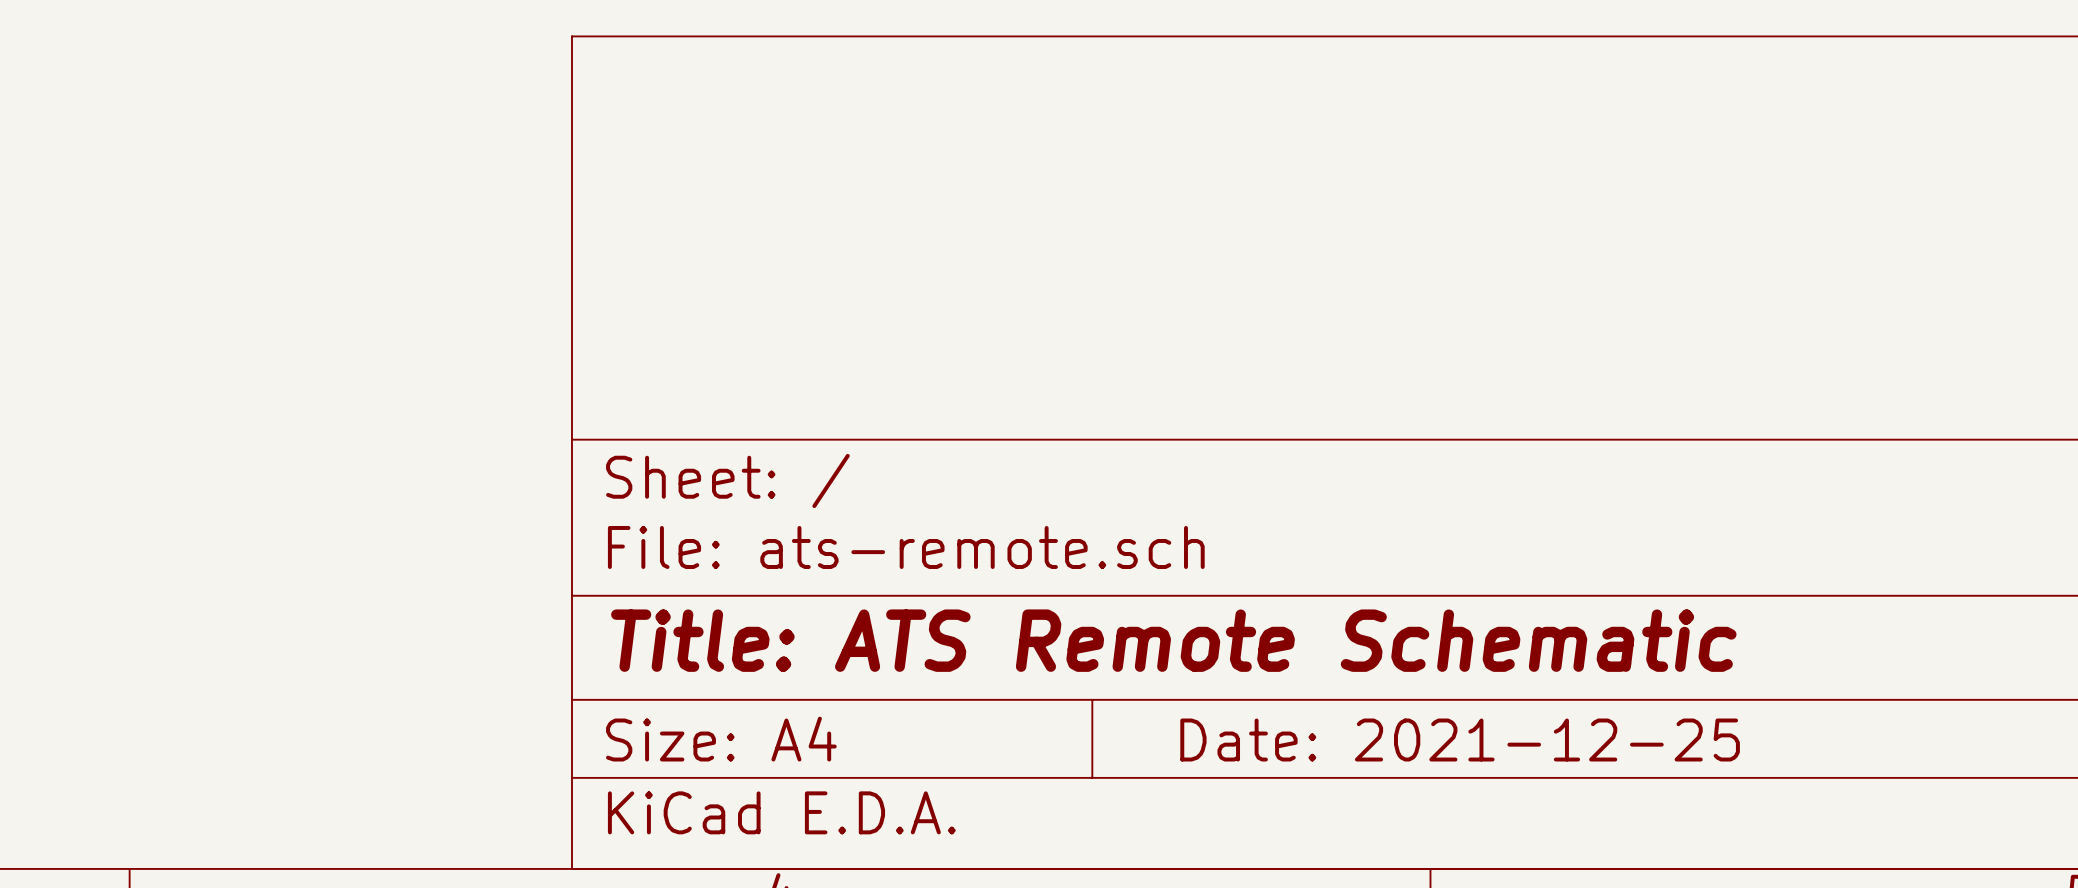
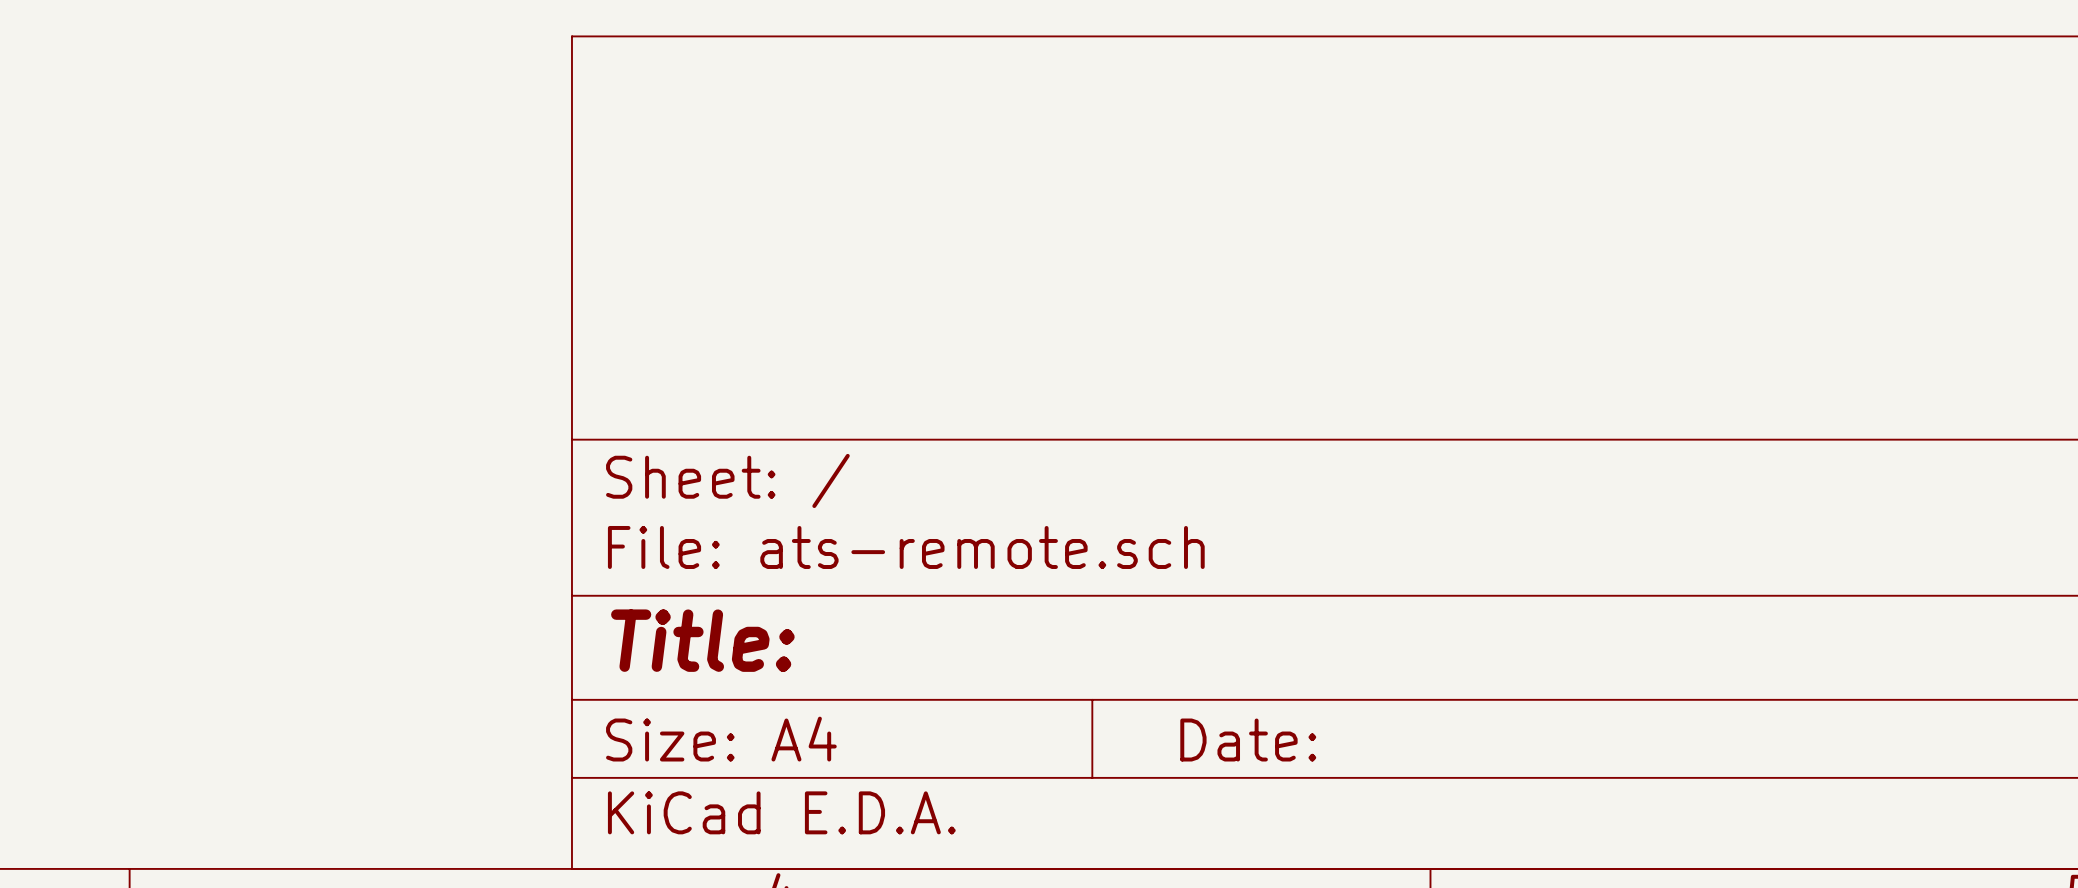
title block: Title: ATS Remote Schematic (1173, 640) -> Title: (702, 640)
title block: Date: 2021-12-25 (1460, 740) -> Date: (1248, 740)

